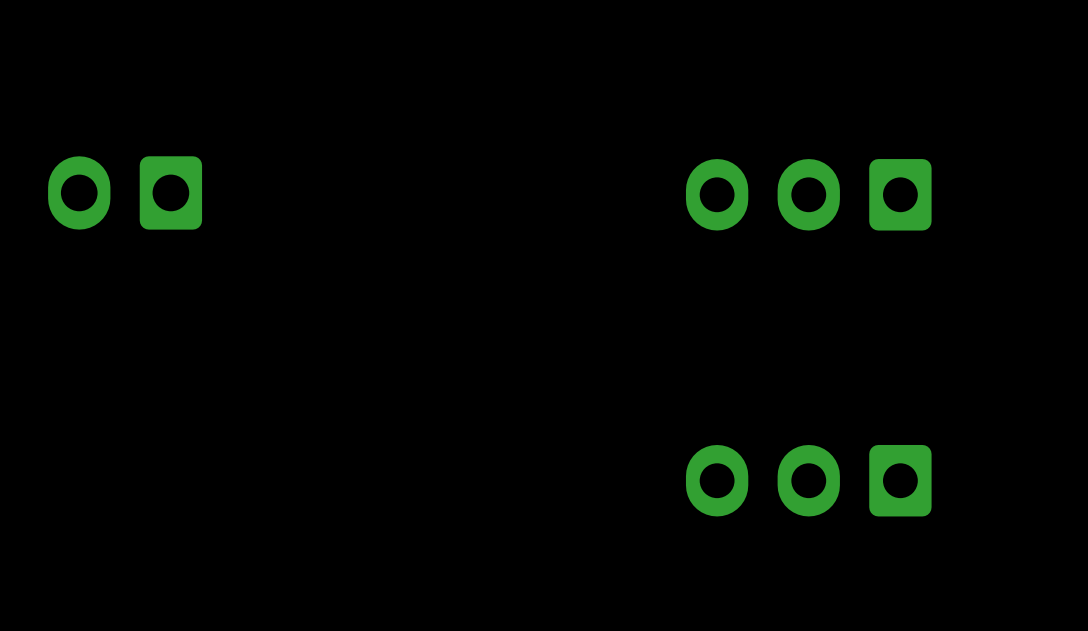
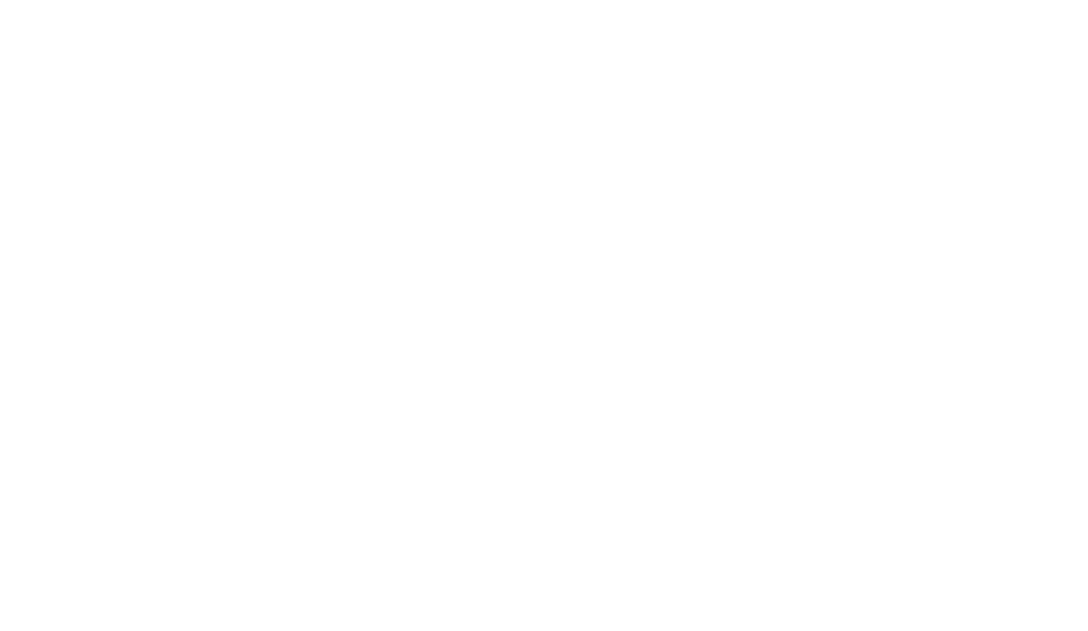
part: (125, 192) -> none
part: (808, 194) -> none
part: (808, 480) -> none

